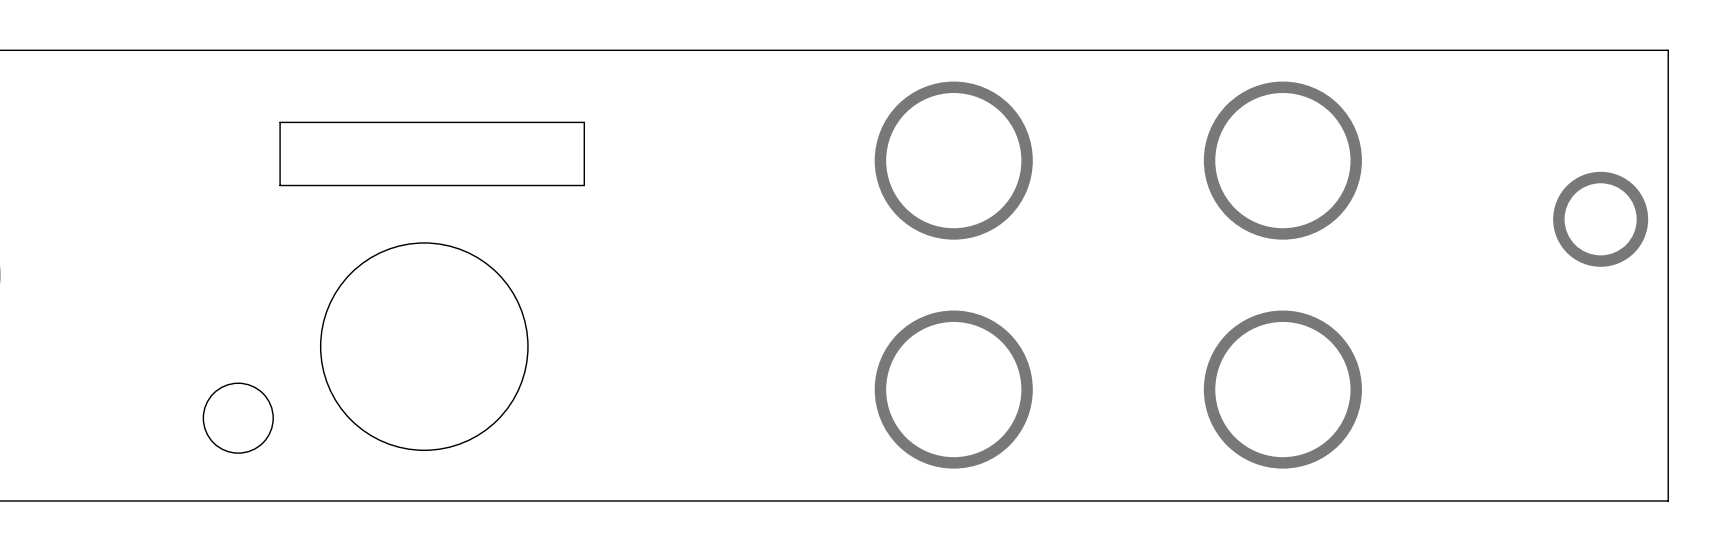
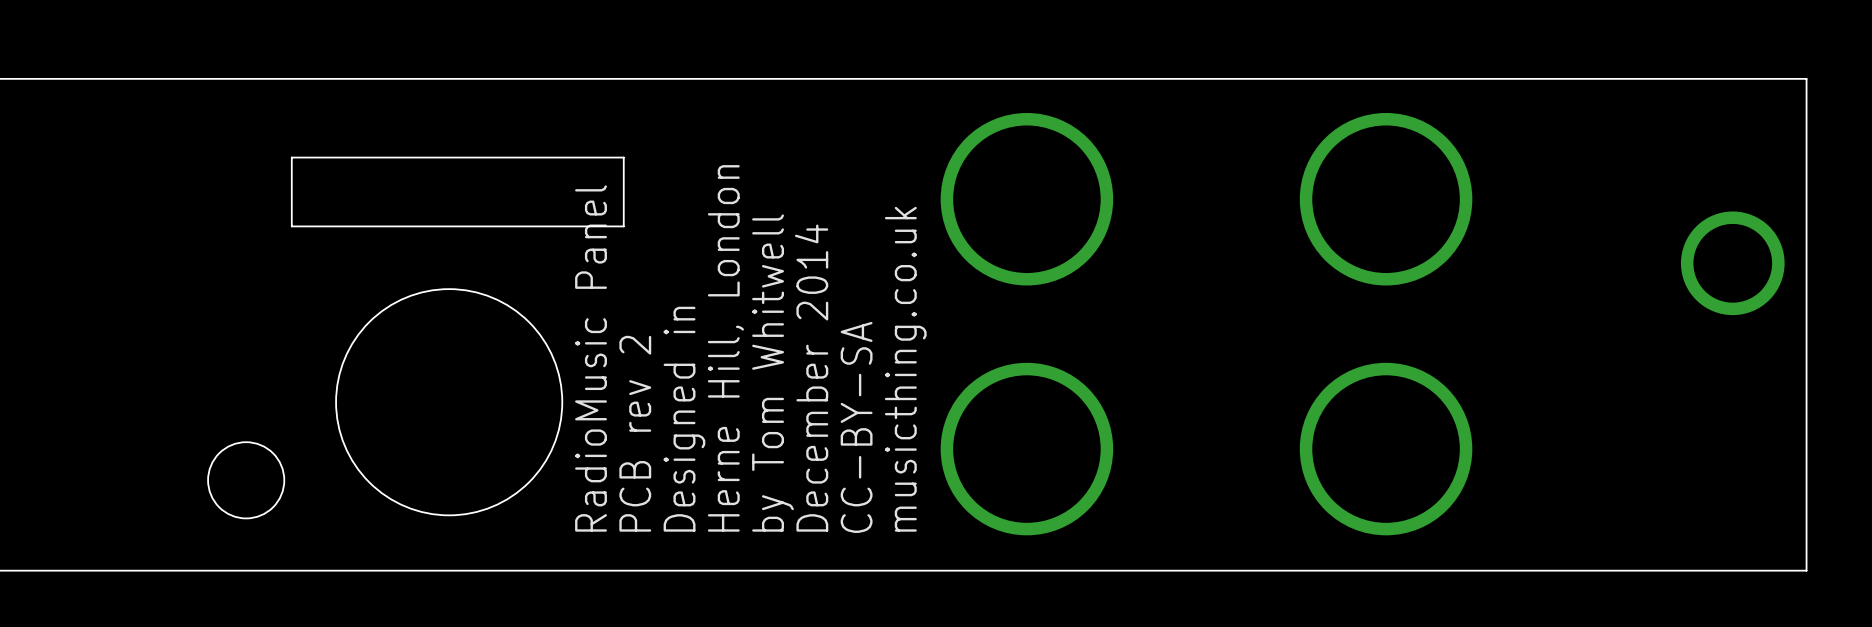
text: none -> Herne Hill, London (725, 348)
text: none -> RadioMusic Panel (591, 358)
text: none -> musicthing.co.uk (905, 369)
text: none -> by Tom Whitwell (772, 373)
text: none -> December 2014 (811, 378)
text: none -> Designed in (684, 419)
text: none -> CC-BY-SA (856, 427)
text: none -> PCB rev 2 (635, 433)

